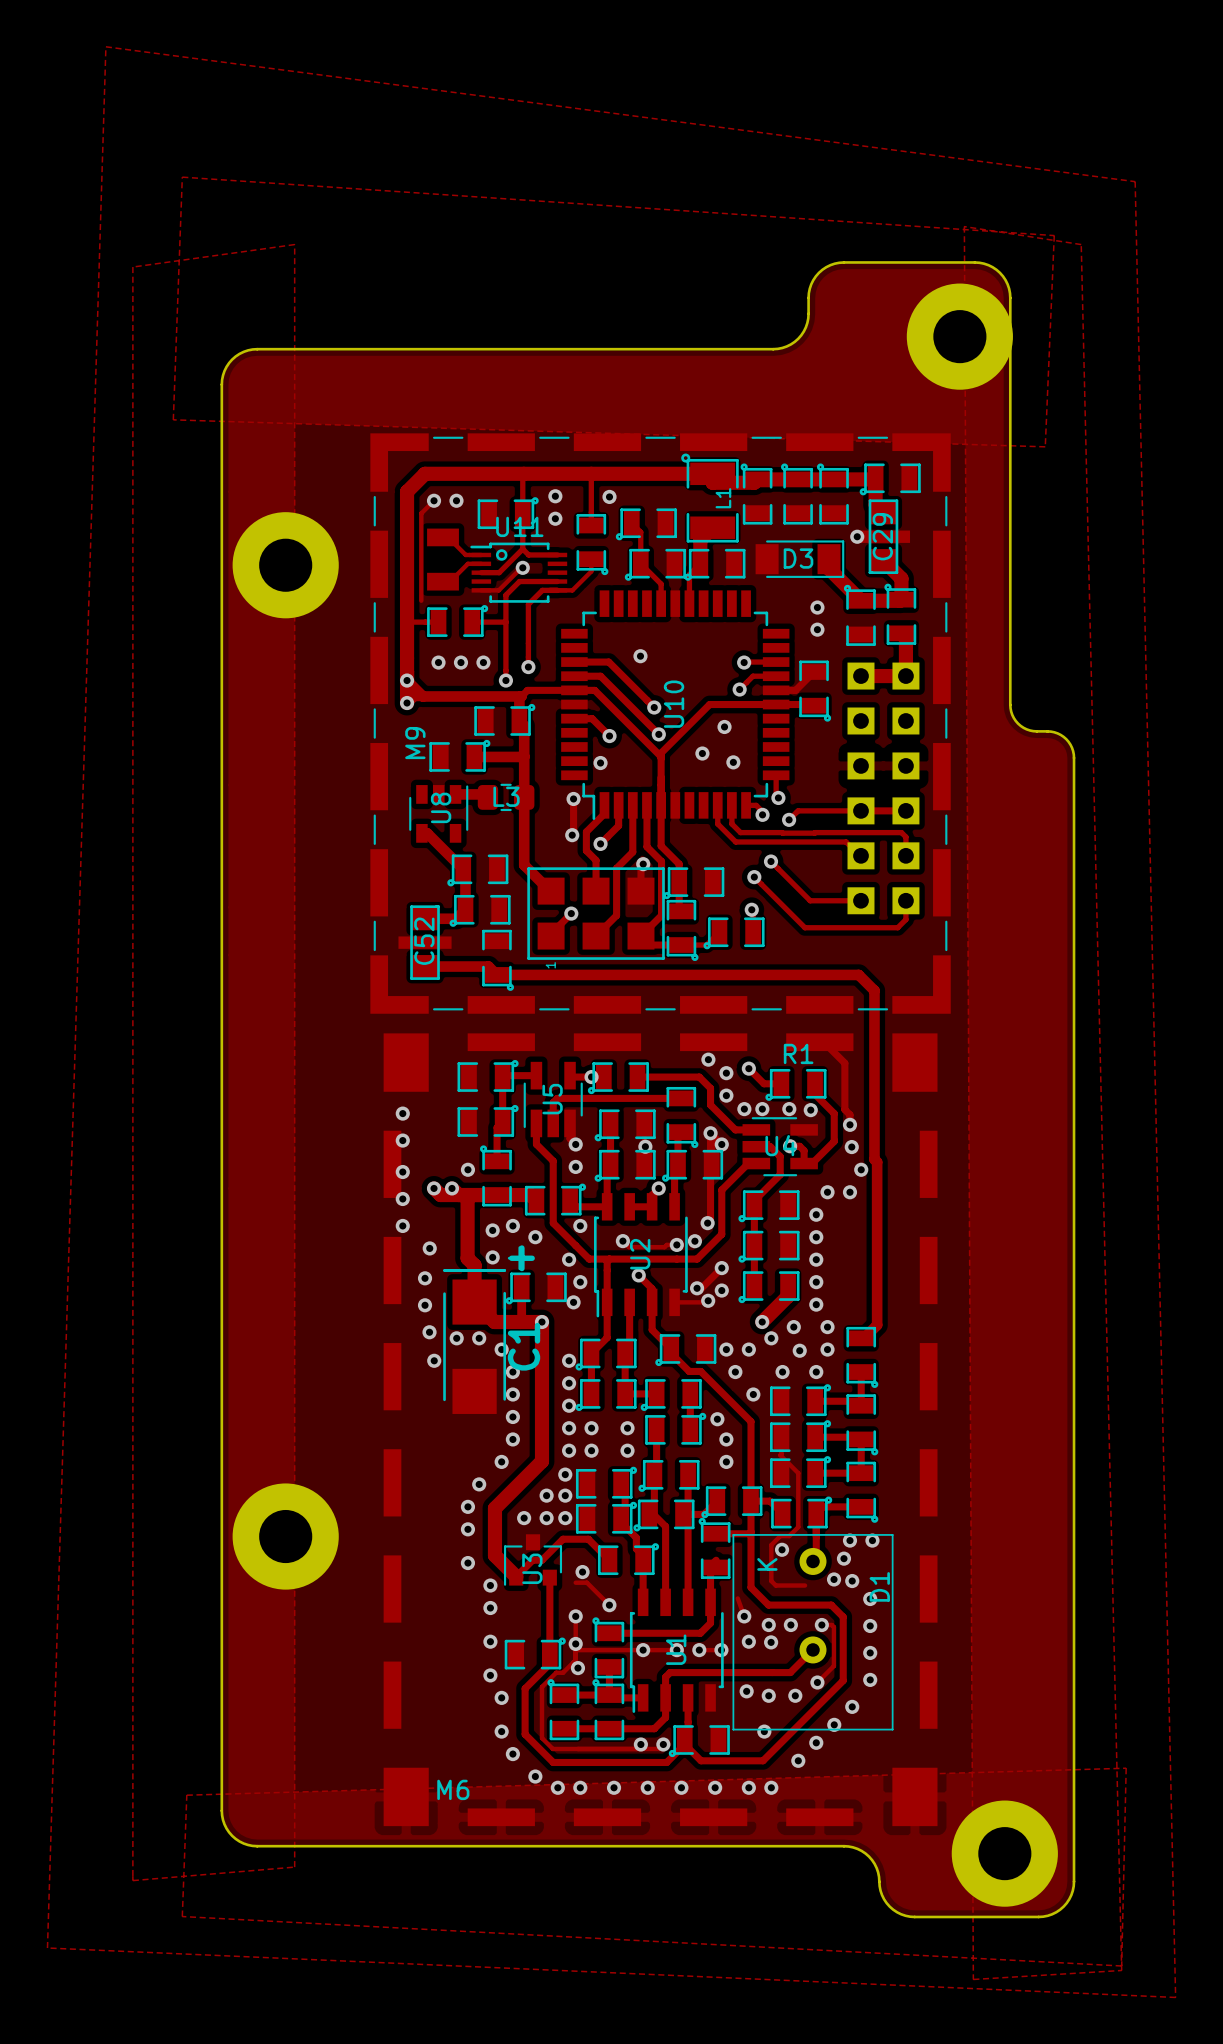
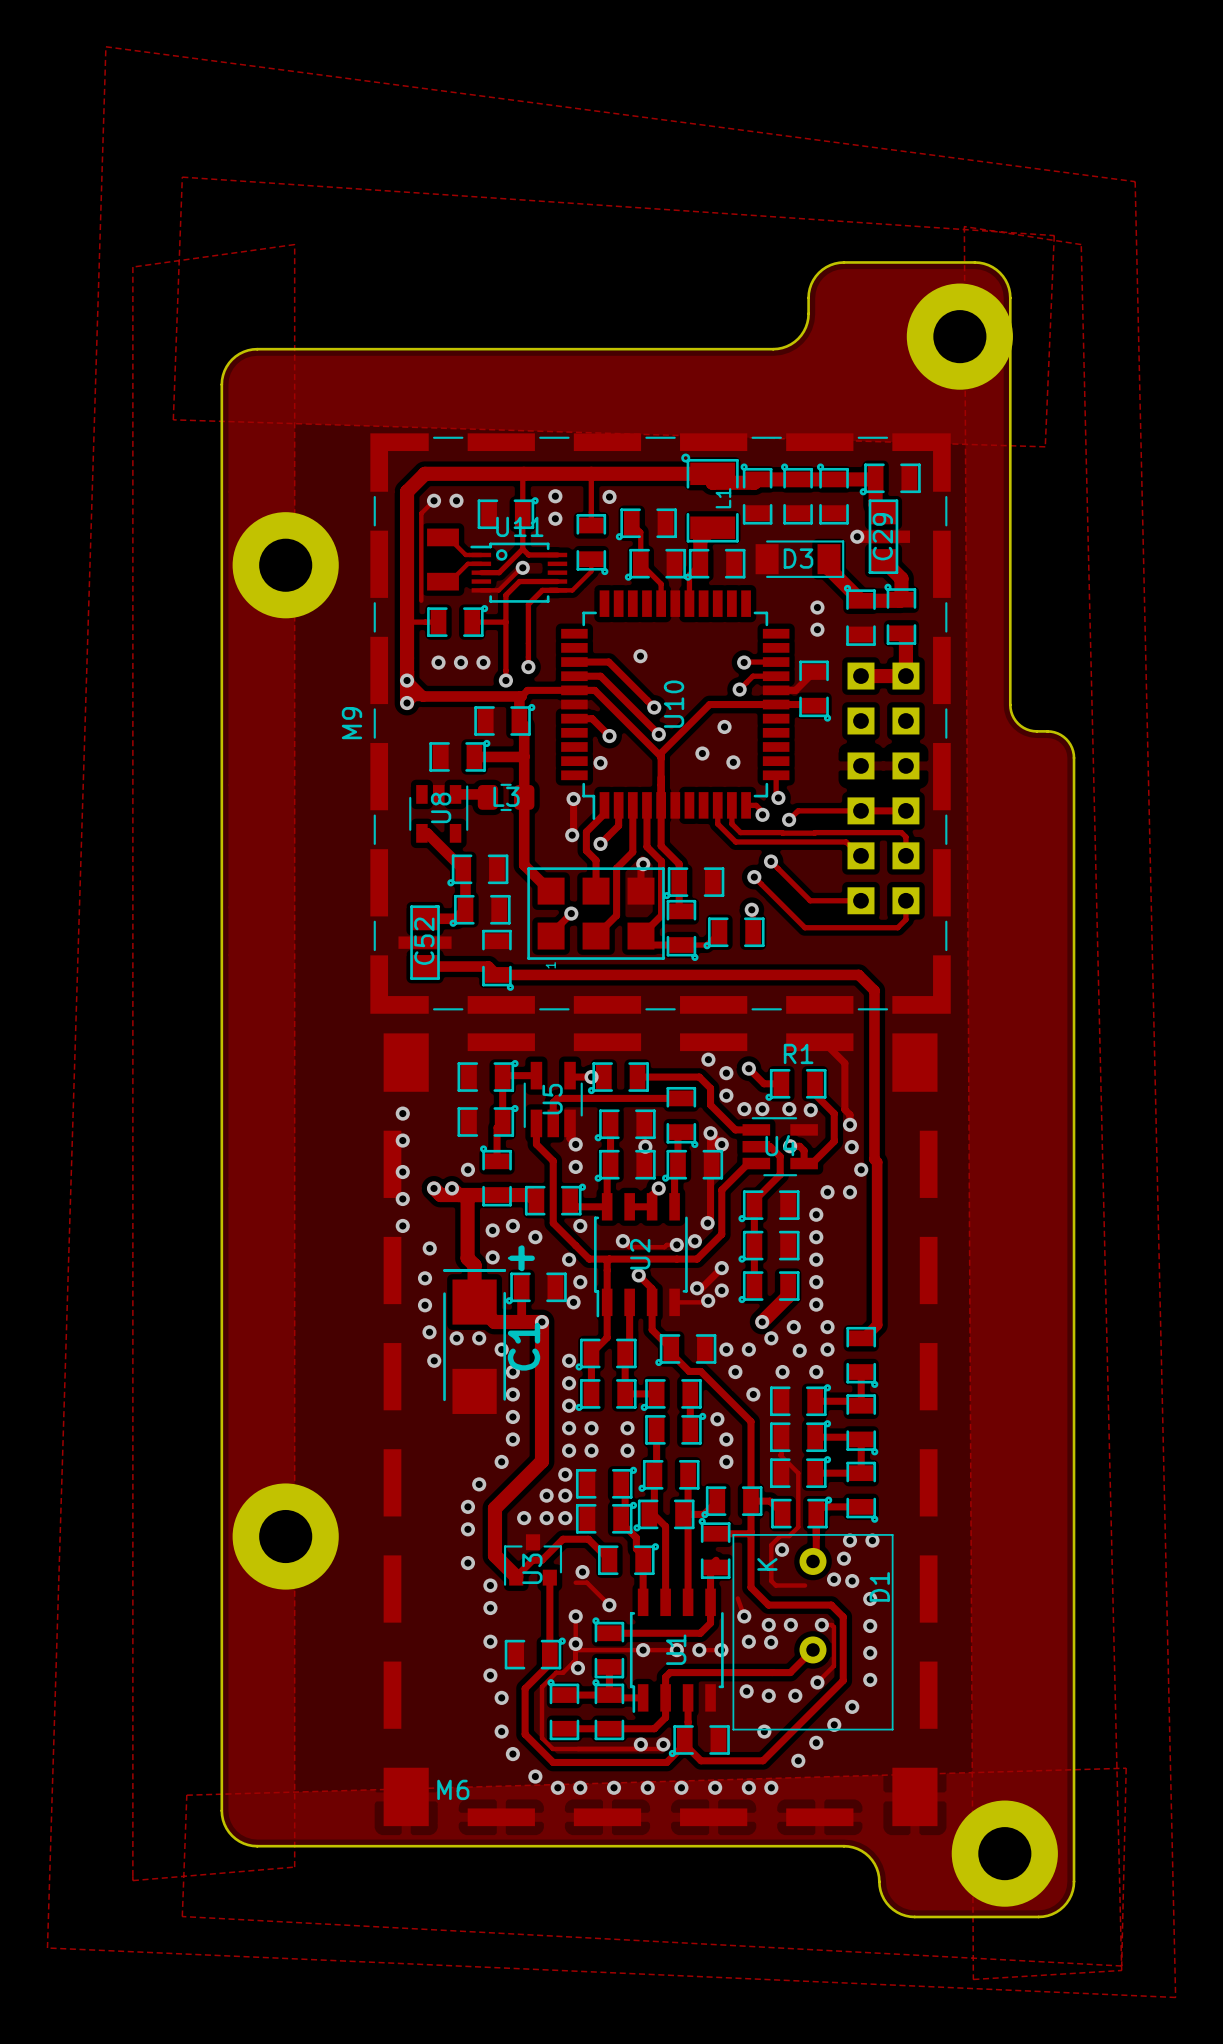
M9 name position: M9 (415, 743) -> M9 (351, 723)

